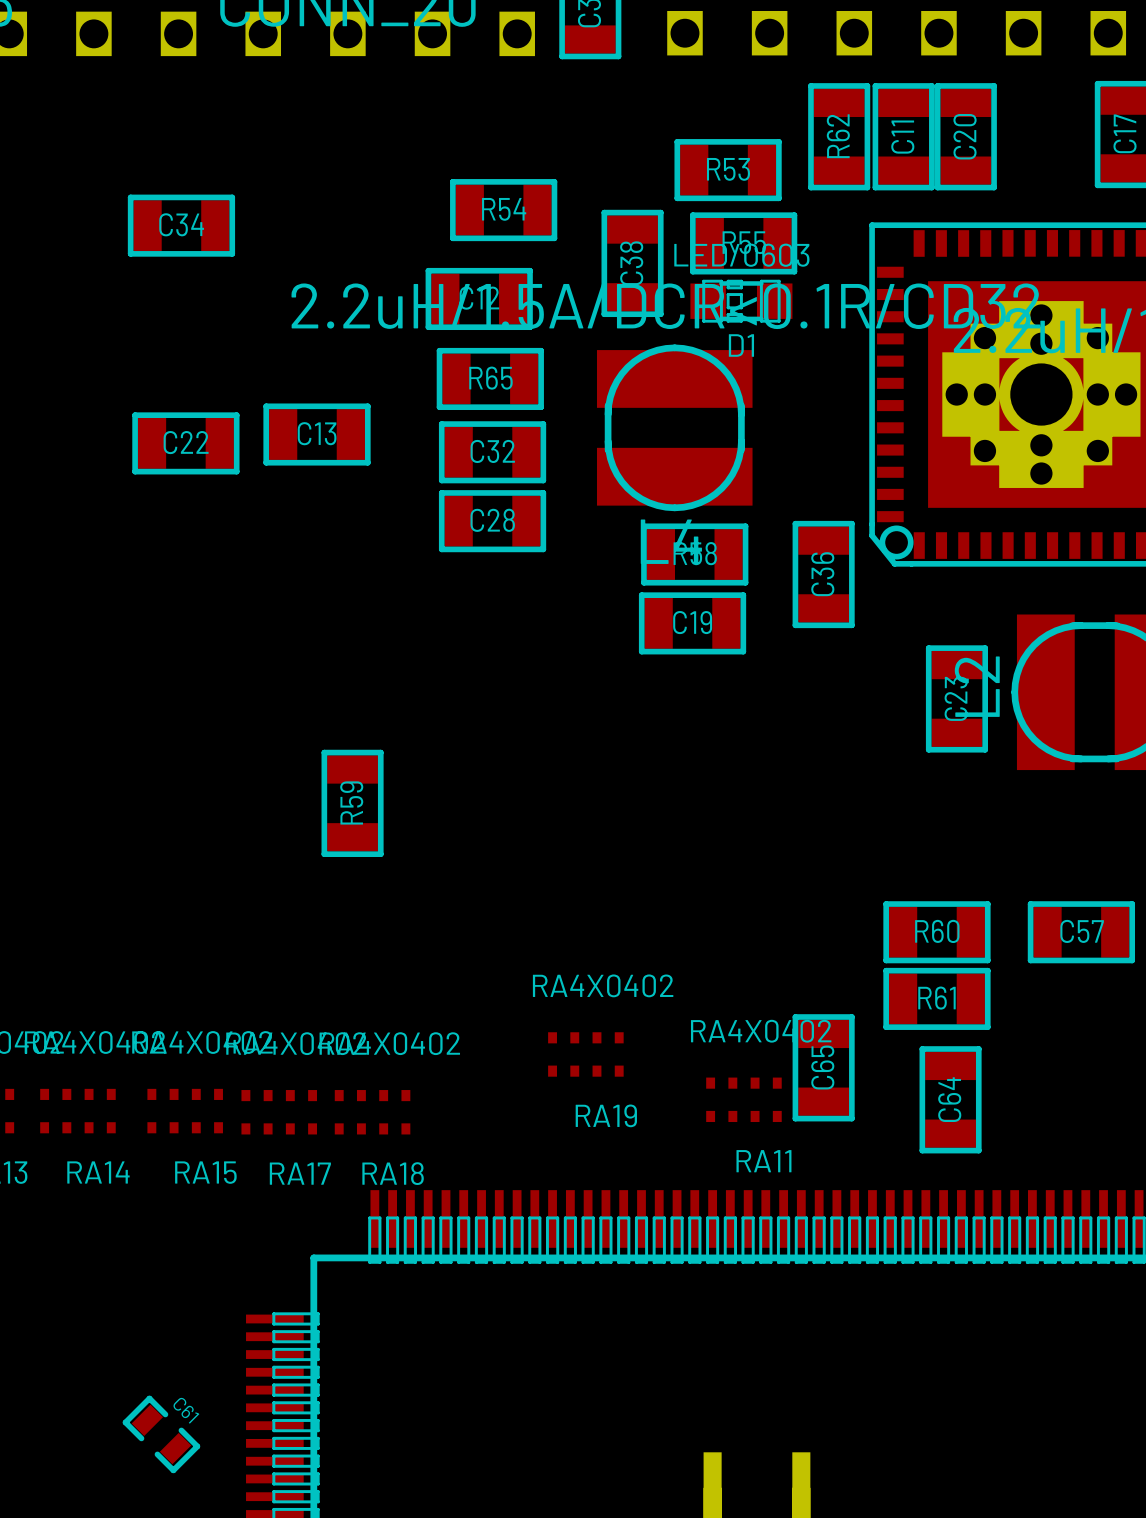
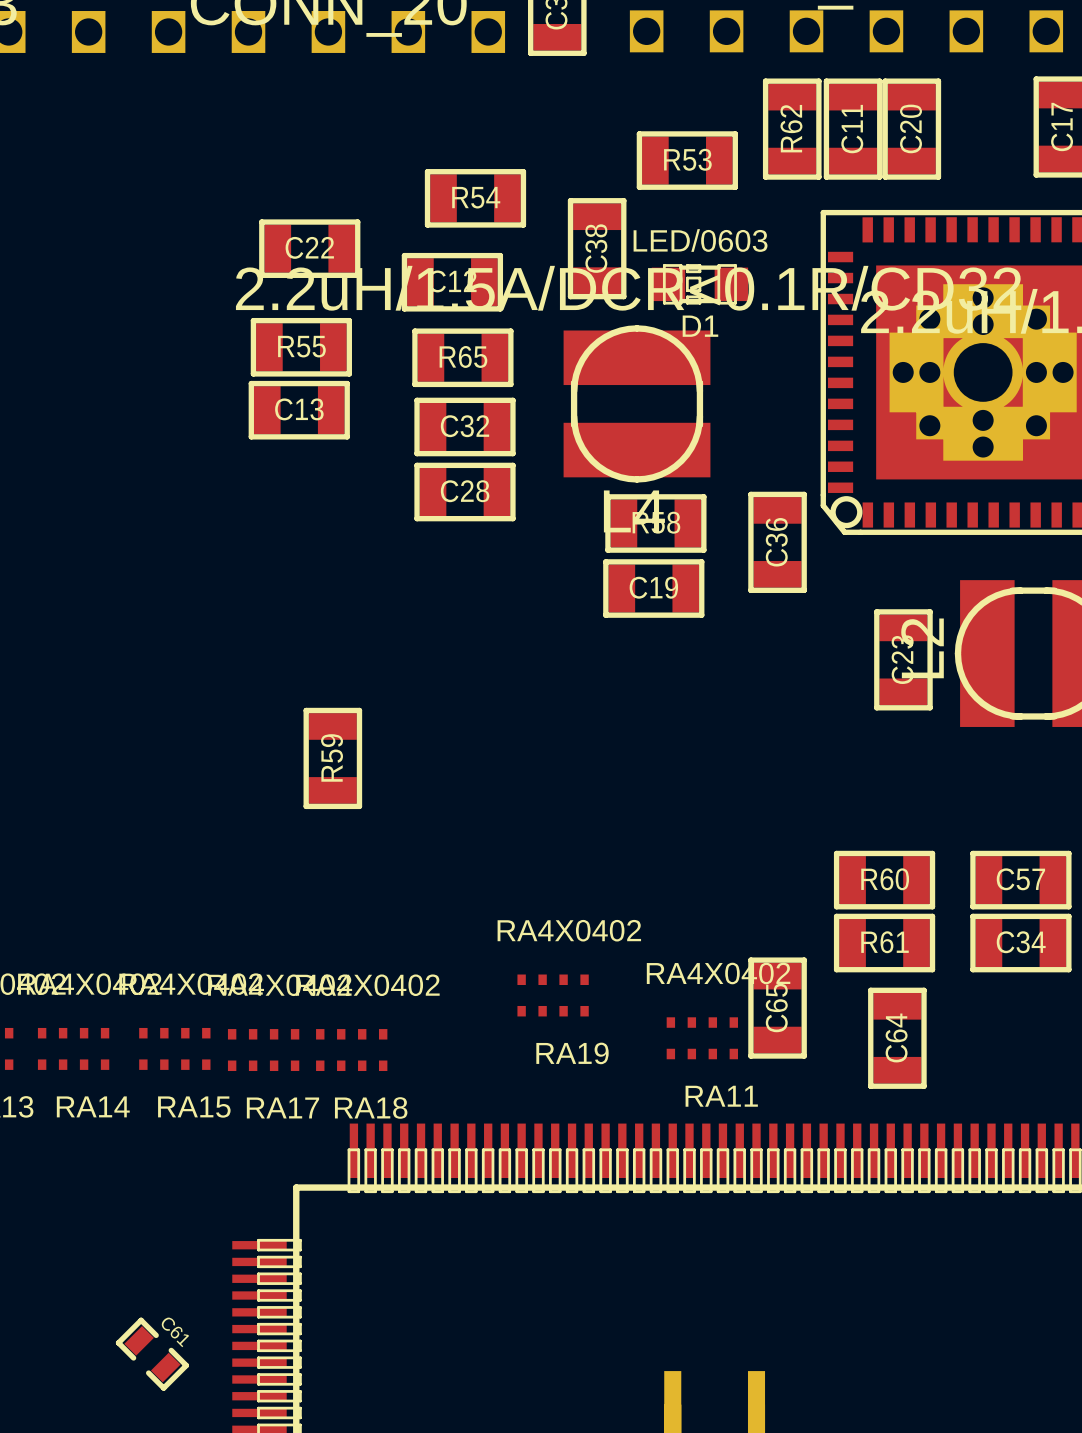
C34 position: (181, 225) -> (1020, 943)
R55 position: (743, 243) -> (301, 347)
C22 position: (185, 443) -> (309, 248)

